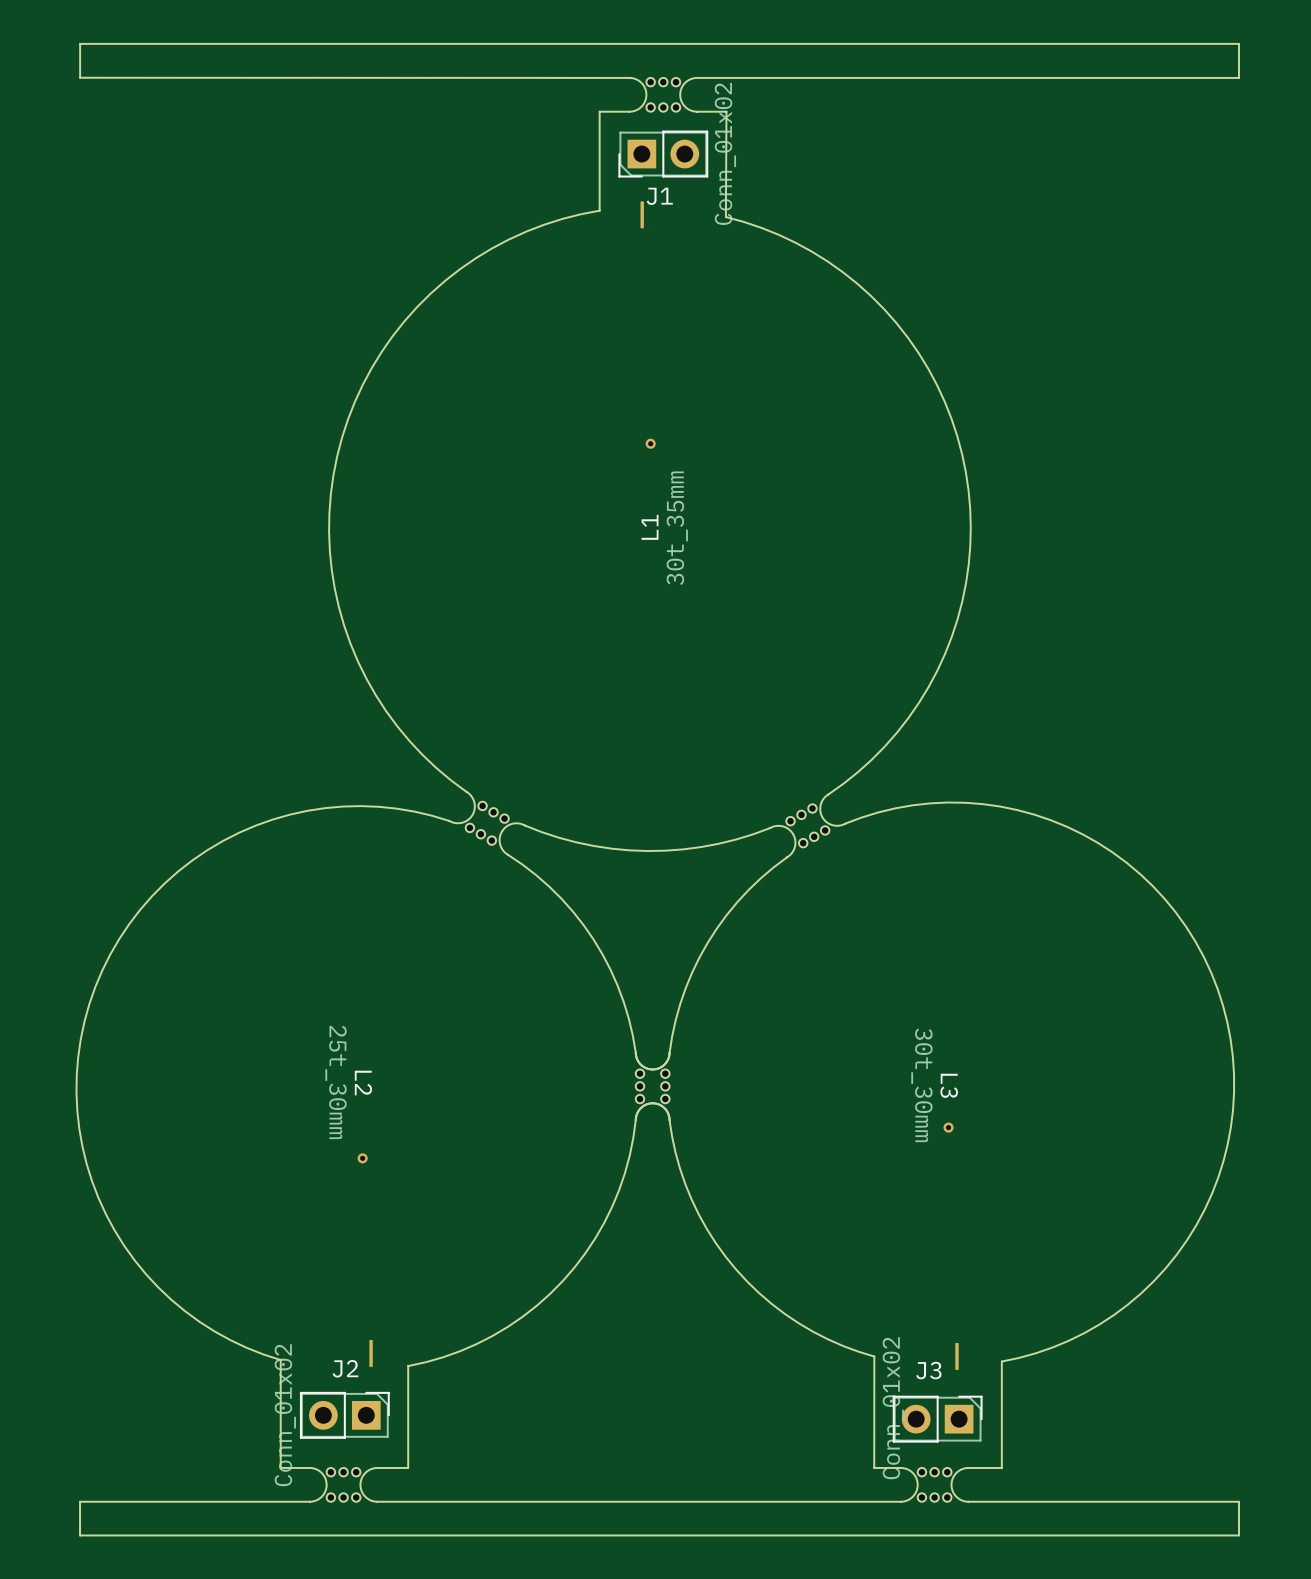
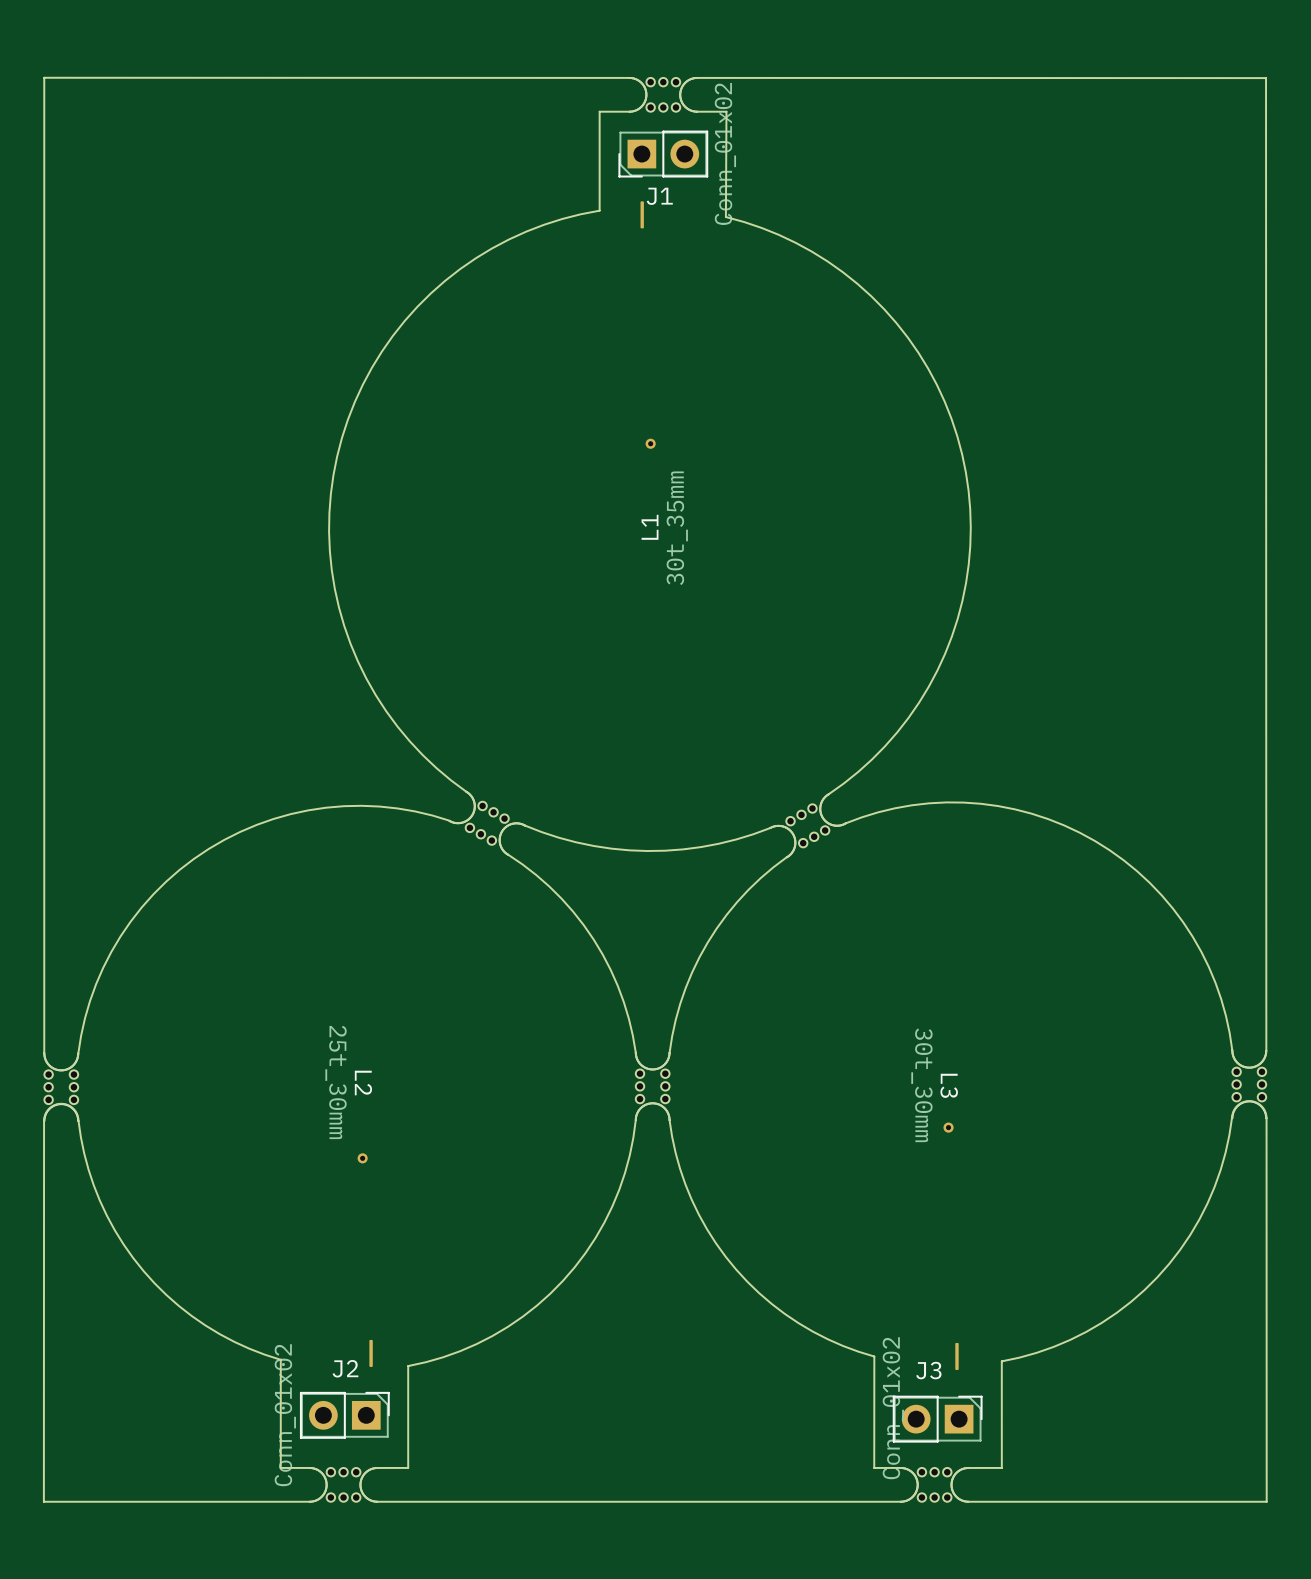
board edge: (80, 77) (80, 43) (1239, 43) (1239, 77) (697, 77) -> (80, 77) (44, 77) (44, 1052) (46, 1062) (52, 1068) (60, 1070) (69, 1068) (75, 1063) (90, 1001) (103, 967) (120, 936) (153, 894) (179, 869) (208, 848) (240, 831) (273, 818) (326, 807) (361, 805) (397, 808) (449, 820)
part footprint: [628, 77, 698, 113] -> [628, 77, 698, 113]
board edge: none -> (629, 77) (640, 82) (646, 94) (642, 106) (629, 111)
board edge: none -> (697, 111) (685, 106) (680, 94) (685, 82) (697, 77) (1266, 78) (1266, 1050) (1264, 1058) (1258, 1064) (1251, 1067) (1242, 1066) (1236, 1061) (1232, 1054) (1221, 999) (1208, 967) (1192, 936) (1172, 908) (1149, 882) (1123, 860) (1094, 841) (1064, 825) (1031, 813) (998, 806) (963, 802) (929, 803) (894, 808) (834, 825) (826, 822) (820, 813) (821, 802) (828, 794)
part footprint: [448, 790, 526, 856] -> [448, 790, 526, 856]
part footprint: [769, 793, 847, 859] -> [769, 793, 847, 859]
board edge: (449, 821) (397, 808) (343, 806) (307, 810) (272, 819) (222, 840) (178, 871) (140, 909) (110, 954) (89, 1004) (78, 1056) (77, 1110) (86, 1163) (98, 1197) (114, 1230) (145, 1274) (185, 1311) (230, 1340) (280, 1360) -> (449, 820) (462, 822) (472, 814) (474, 802) (466, 791)
board edge: (845, 823) (895, 808) (930, 803) (965, 802) (1000, 806) (1034, 814) (1082, 834) (1126, 862) (1152, 886) (1175, 912) (1195, 941) (1211, 972) (1227, 1022) (1234, 1074) (1230, 1126) (1223, 1161) (1204, 1209) (1187, 1240) (1165, 1268) (1141, 1293) (1114, 1314) (1068, 1340) (1035, 1353) (1001, 1361) (1001, 1467) -> (1239, 1501) (1266, 1501) (1266, 1118) (1261, 1106) (1251, 1101) (1241, 1103) (1233, 1111) (1225, 1152) (1207, 1203) (1180, 1249) (1157, 1277) (1116, 1312) (1086, 1331) (1036, 1352) (1001, 1361) (1001, 1467)
board edge: (508, 854) (536, 875) (561, 898) (593, 939) (610, 969) (623, 1002) (635, 1052) -> (524, 825) (515, 823) (505, 827) (500, 835) (501, 847) (506, 853) (536, 875) (561, 898) (593, 939) (610, 969) (623, 1001) (635, 1052)
board edge: (787, 857) (760, 878) (737, 902) (707, 942) (685, 988) (675, 1020) (669, 1053) -> (770, 828) (778, 825) (788, 829) (794, 838) (794, 849) (737, 902) (707, 942) (692, 972) (680, 1003) (669, 1053)
part: none -> (1249, 1084)
part: none -> (61, 1087)
part footprint: [308, 1467, 379, 1503] -> [308, 1467, 379, 1503]
board edge: none -> (309, 1467) (321, 1472) (326, 1484) (321, 1496) (309, 1501)
board edge: none -> (377, 1467) (366, 1472) (360, 1484) (366, 1497) (377, 1501)
part footprint: [899, 1467, 970, 1503] -> [899, 1467, 970, 1503]
board edge: none -> (900, 1467) (912, 1472) (917, 1484) (912, 1496) (900, 1501)
board edge: none -> (968, 1467) (957, 1472) (951, 1484) (955, 1496) (968, 1501)
board edge: (80, 1501) (80, 1535) (1239, 1535) (1239, 1501) -> (80, 1501) (43, 1501) (44, 1120) (45, 1113) (51, 1106) (57, 1104) (66, 1104) (76, 1112) (84, 1153) (99, 1200) (123, 1244) (154, 1283) (178, 1305) (205, 1325) (234, 1341) (280, 1359)

